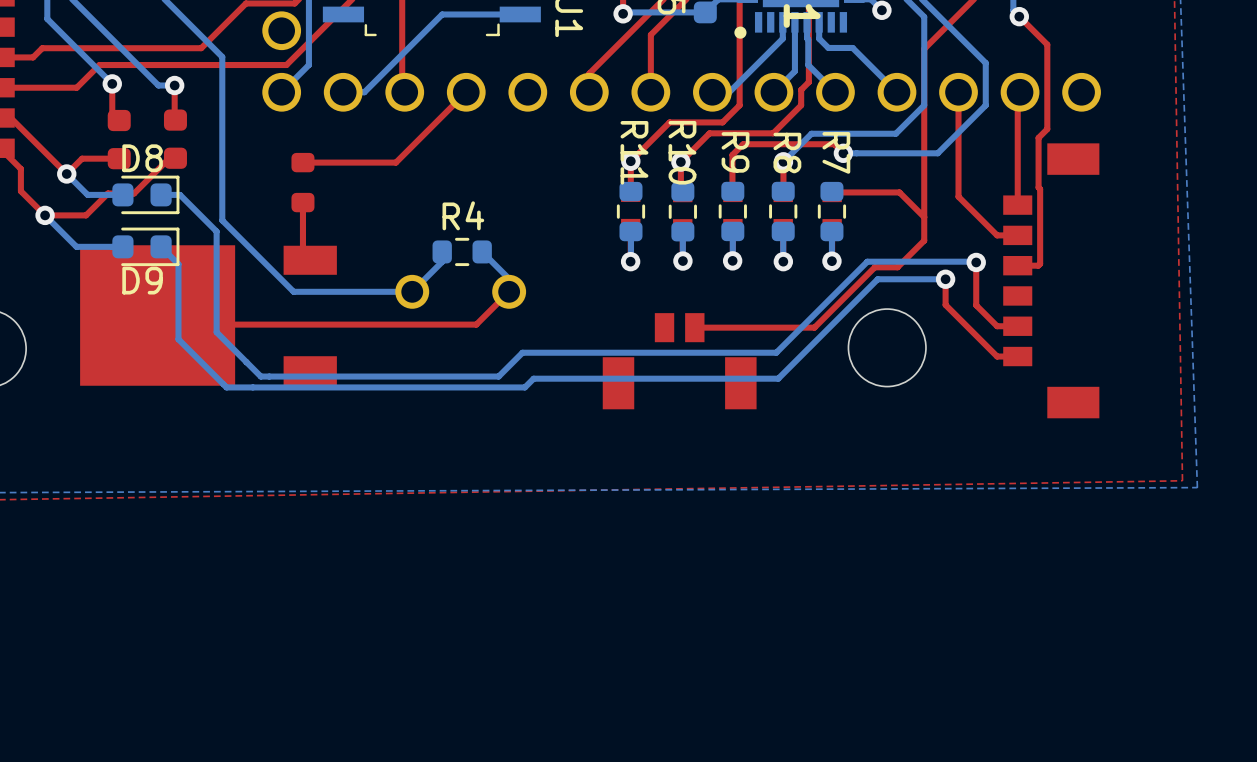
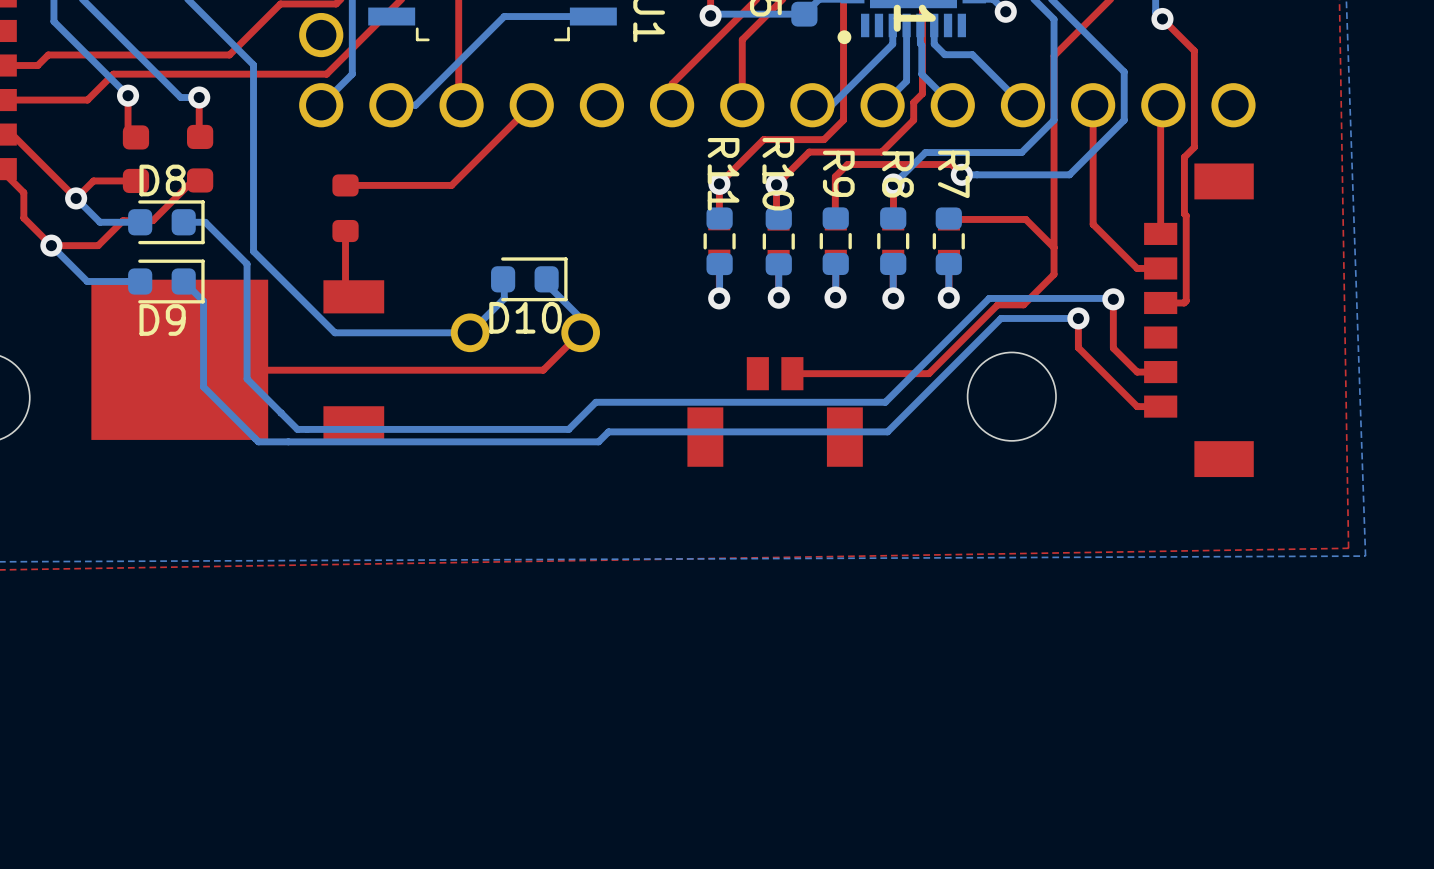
D10: none -> (529, 279)
R4: (462, 251) -> none

